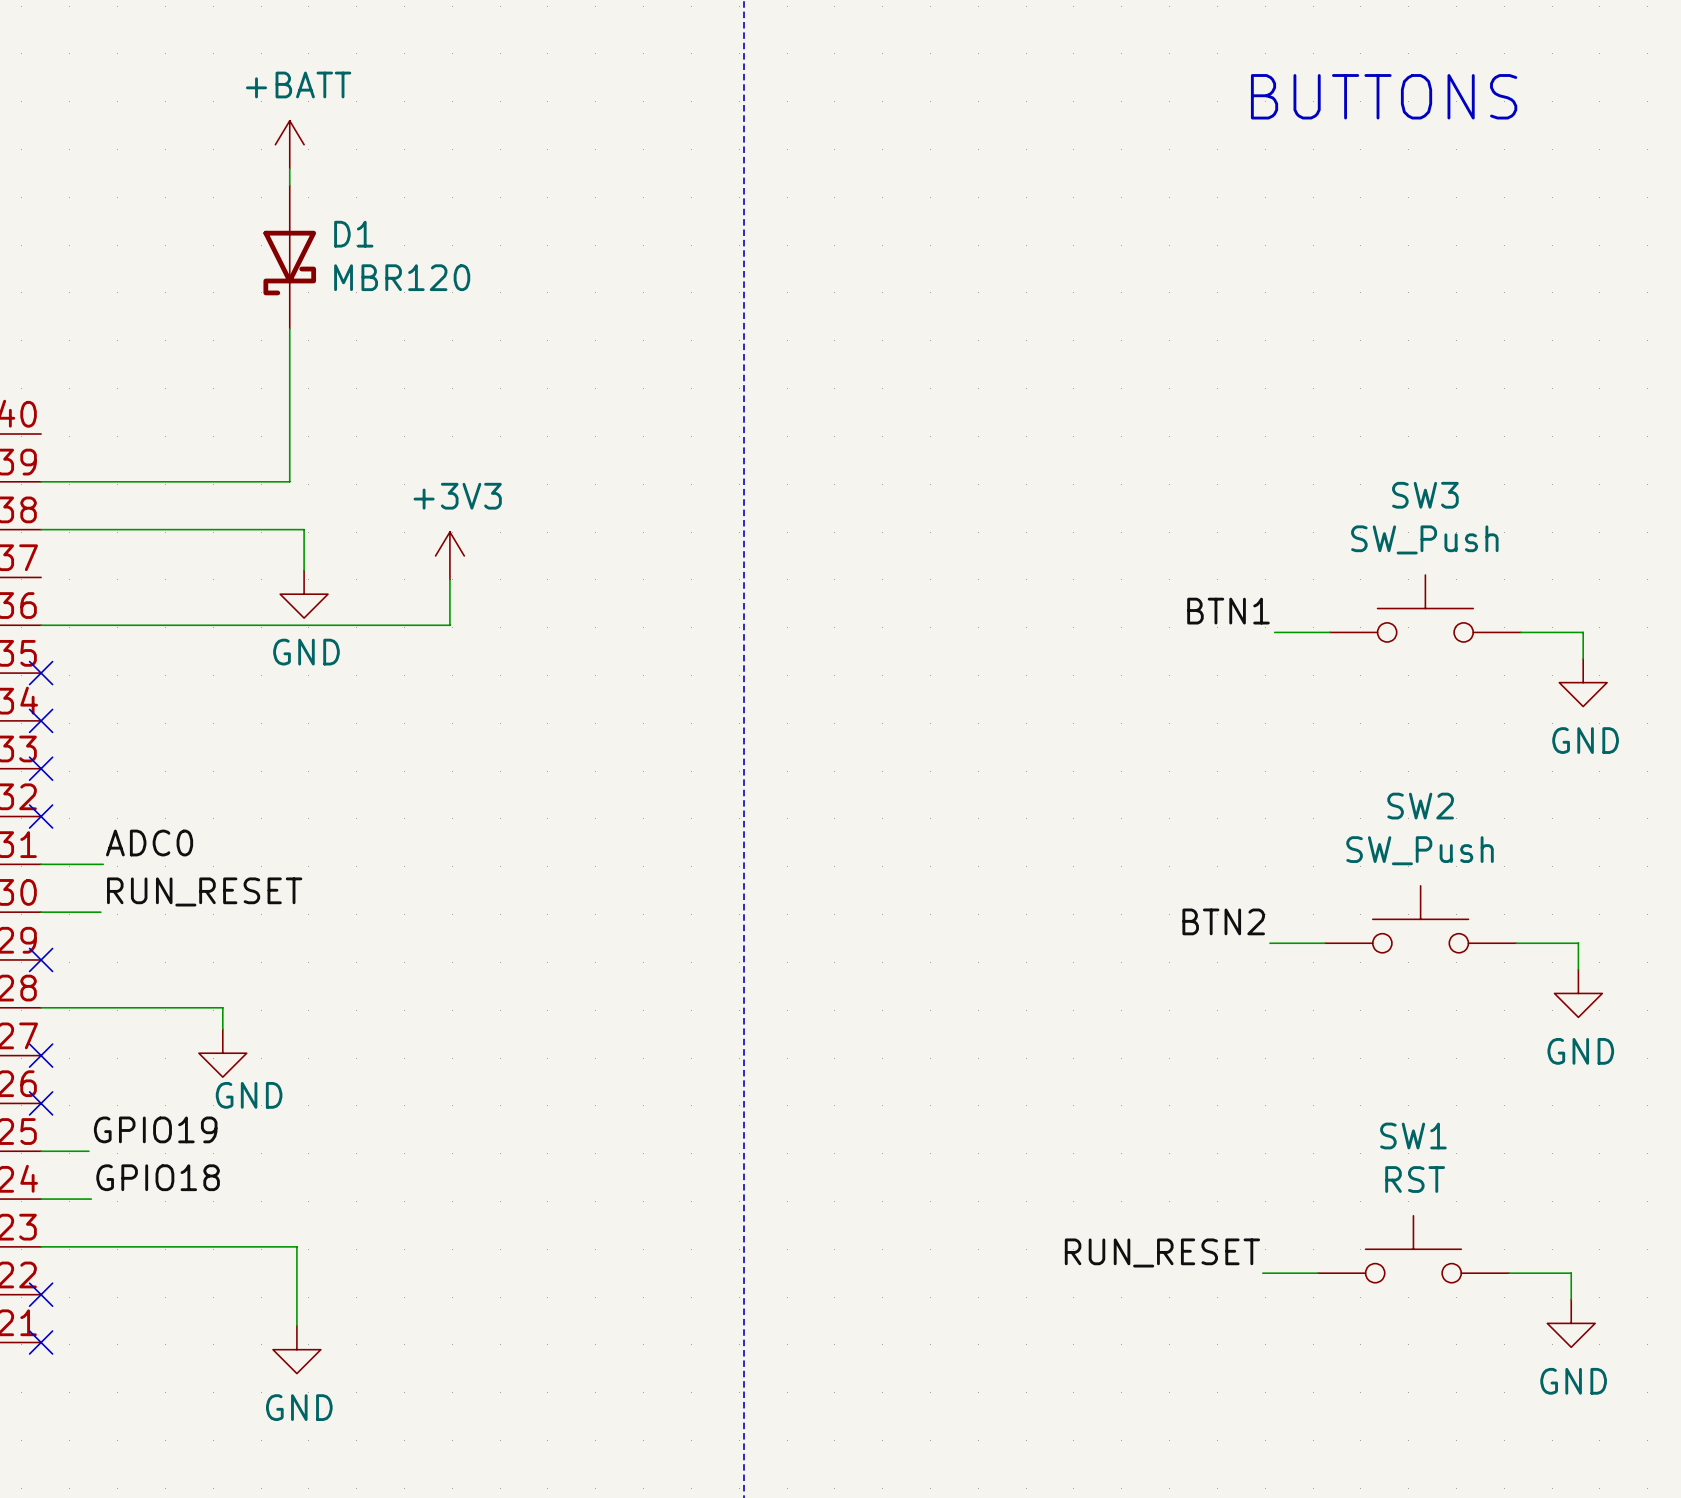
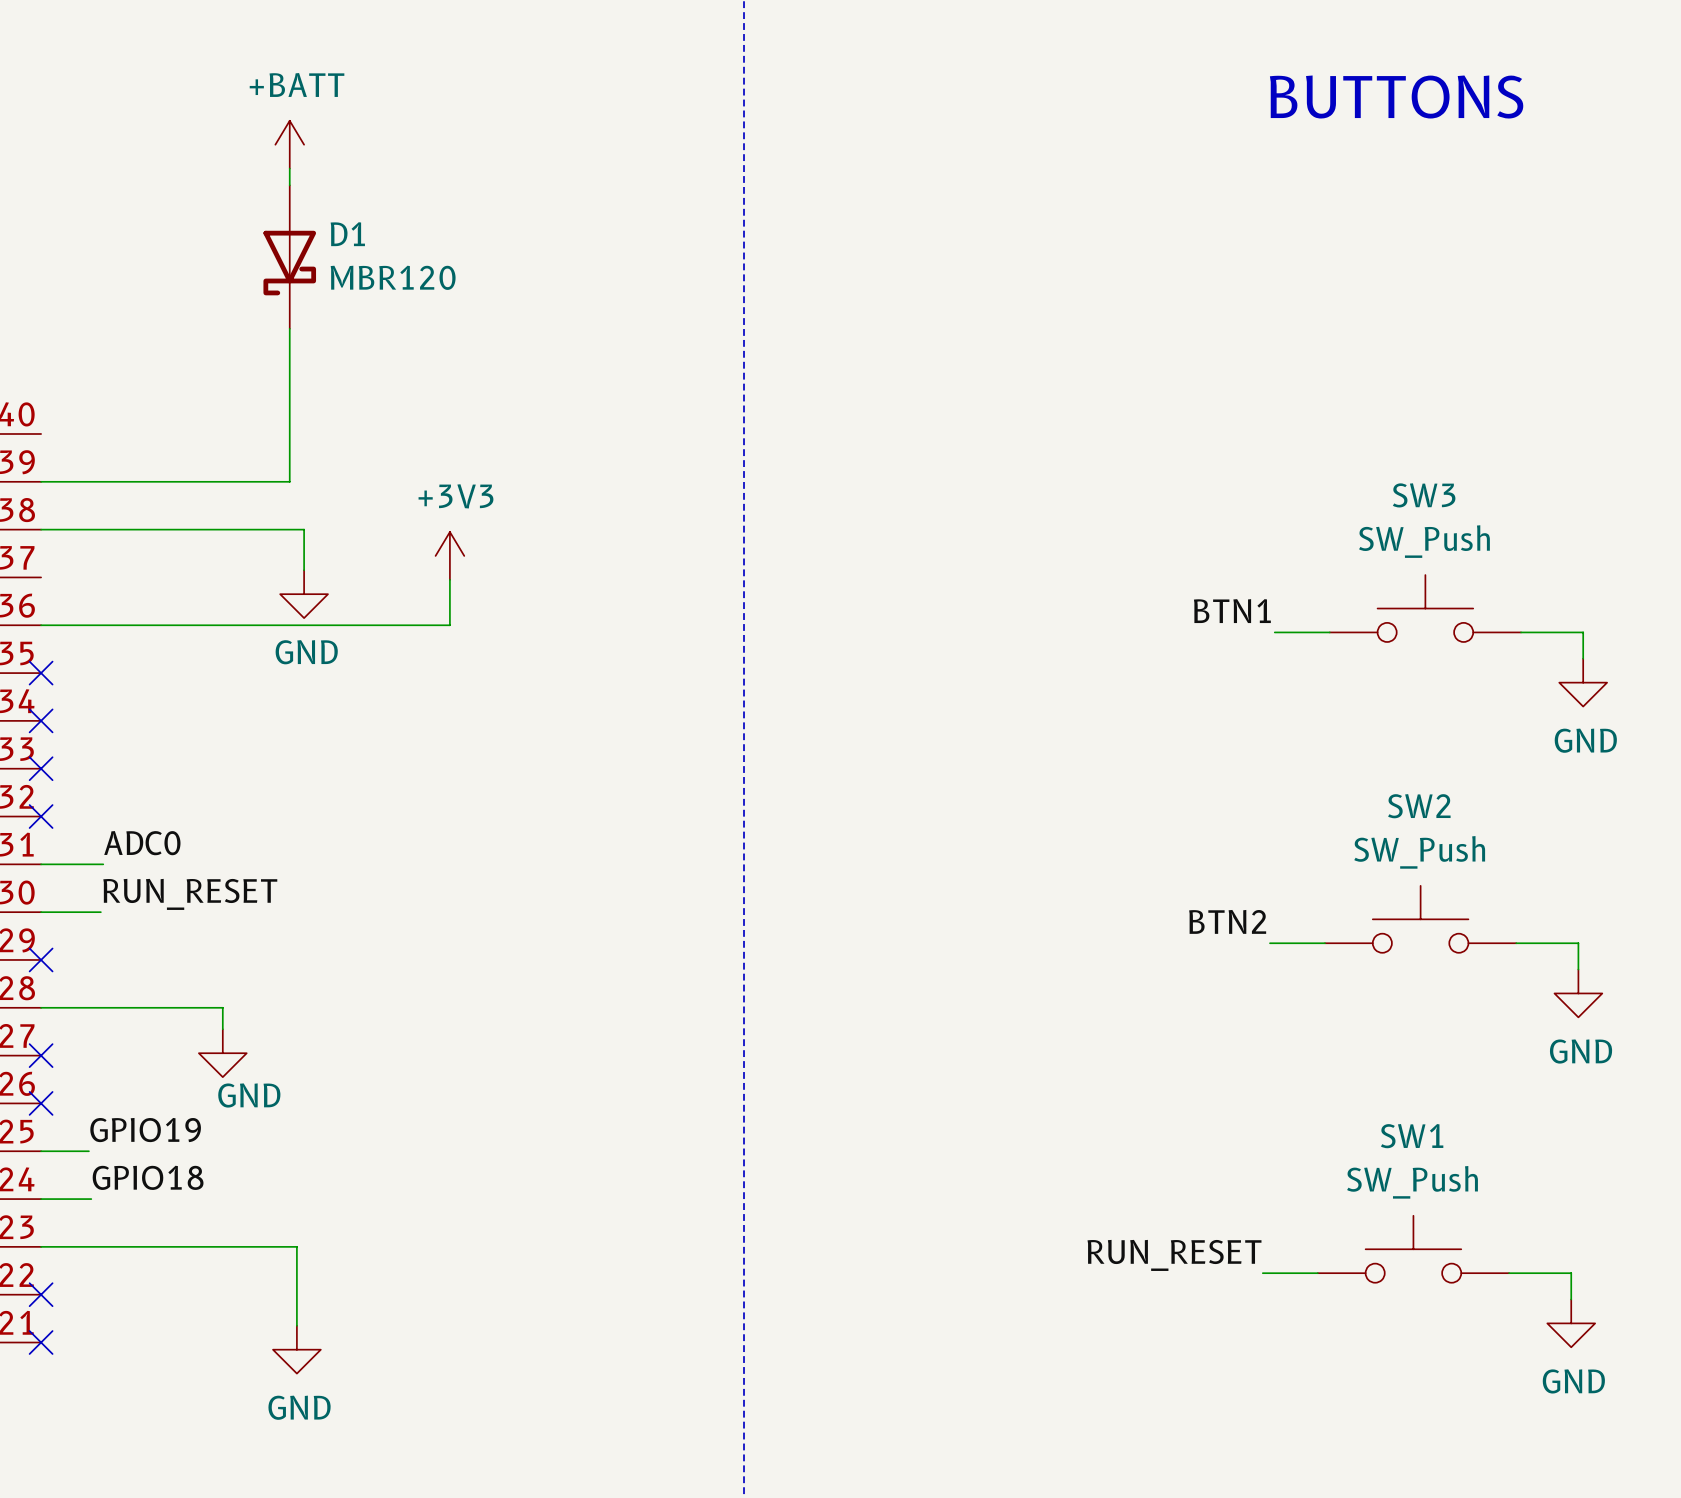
SW1 value: RST (1415, 1179) -> SW_Push (1412, 1182)

